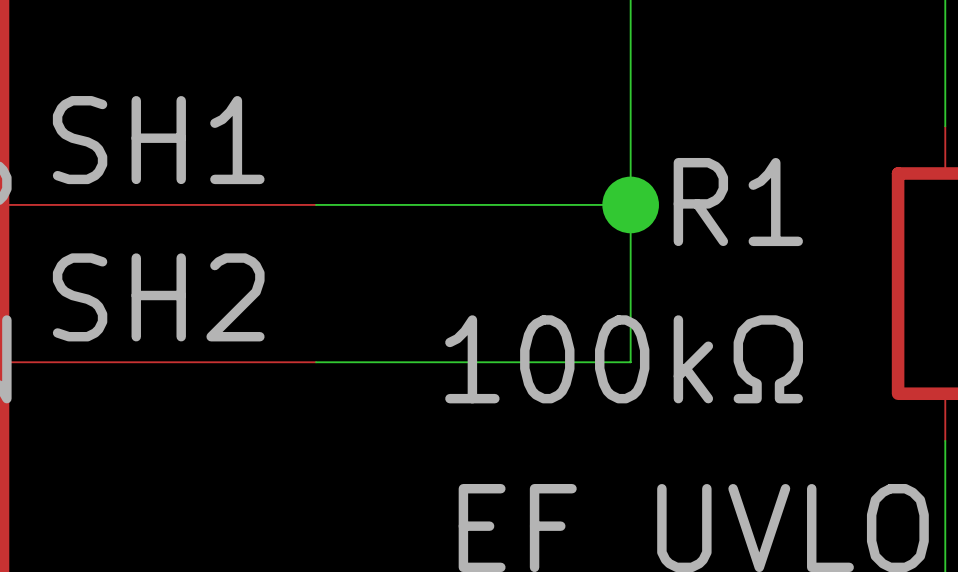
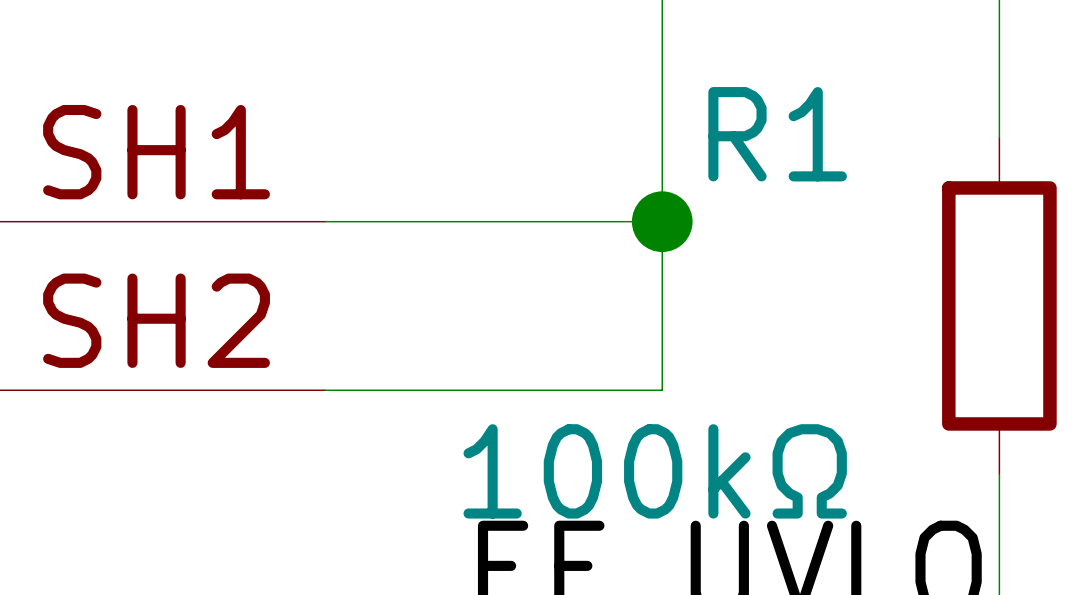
R1 name position: R1 (738, 202) -> R1 (777, 134)
R1 value position: 100kΩ (624, 359) -> 100kΩ (655, 471)

